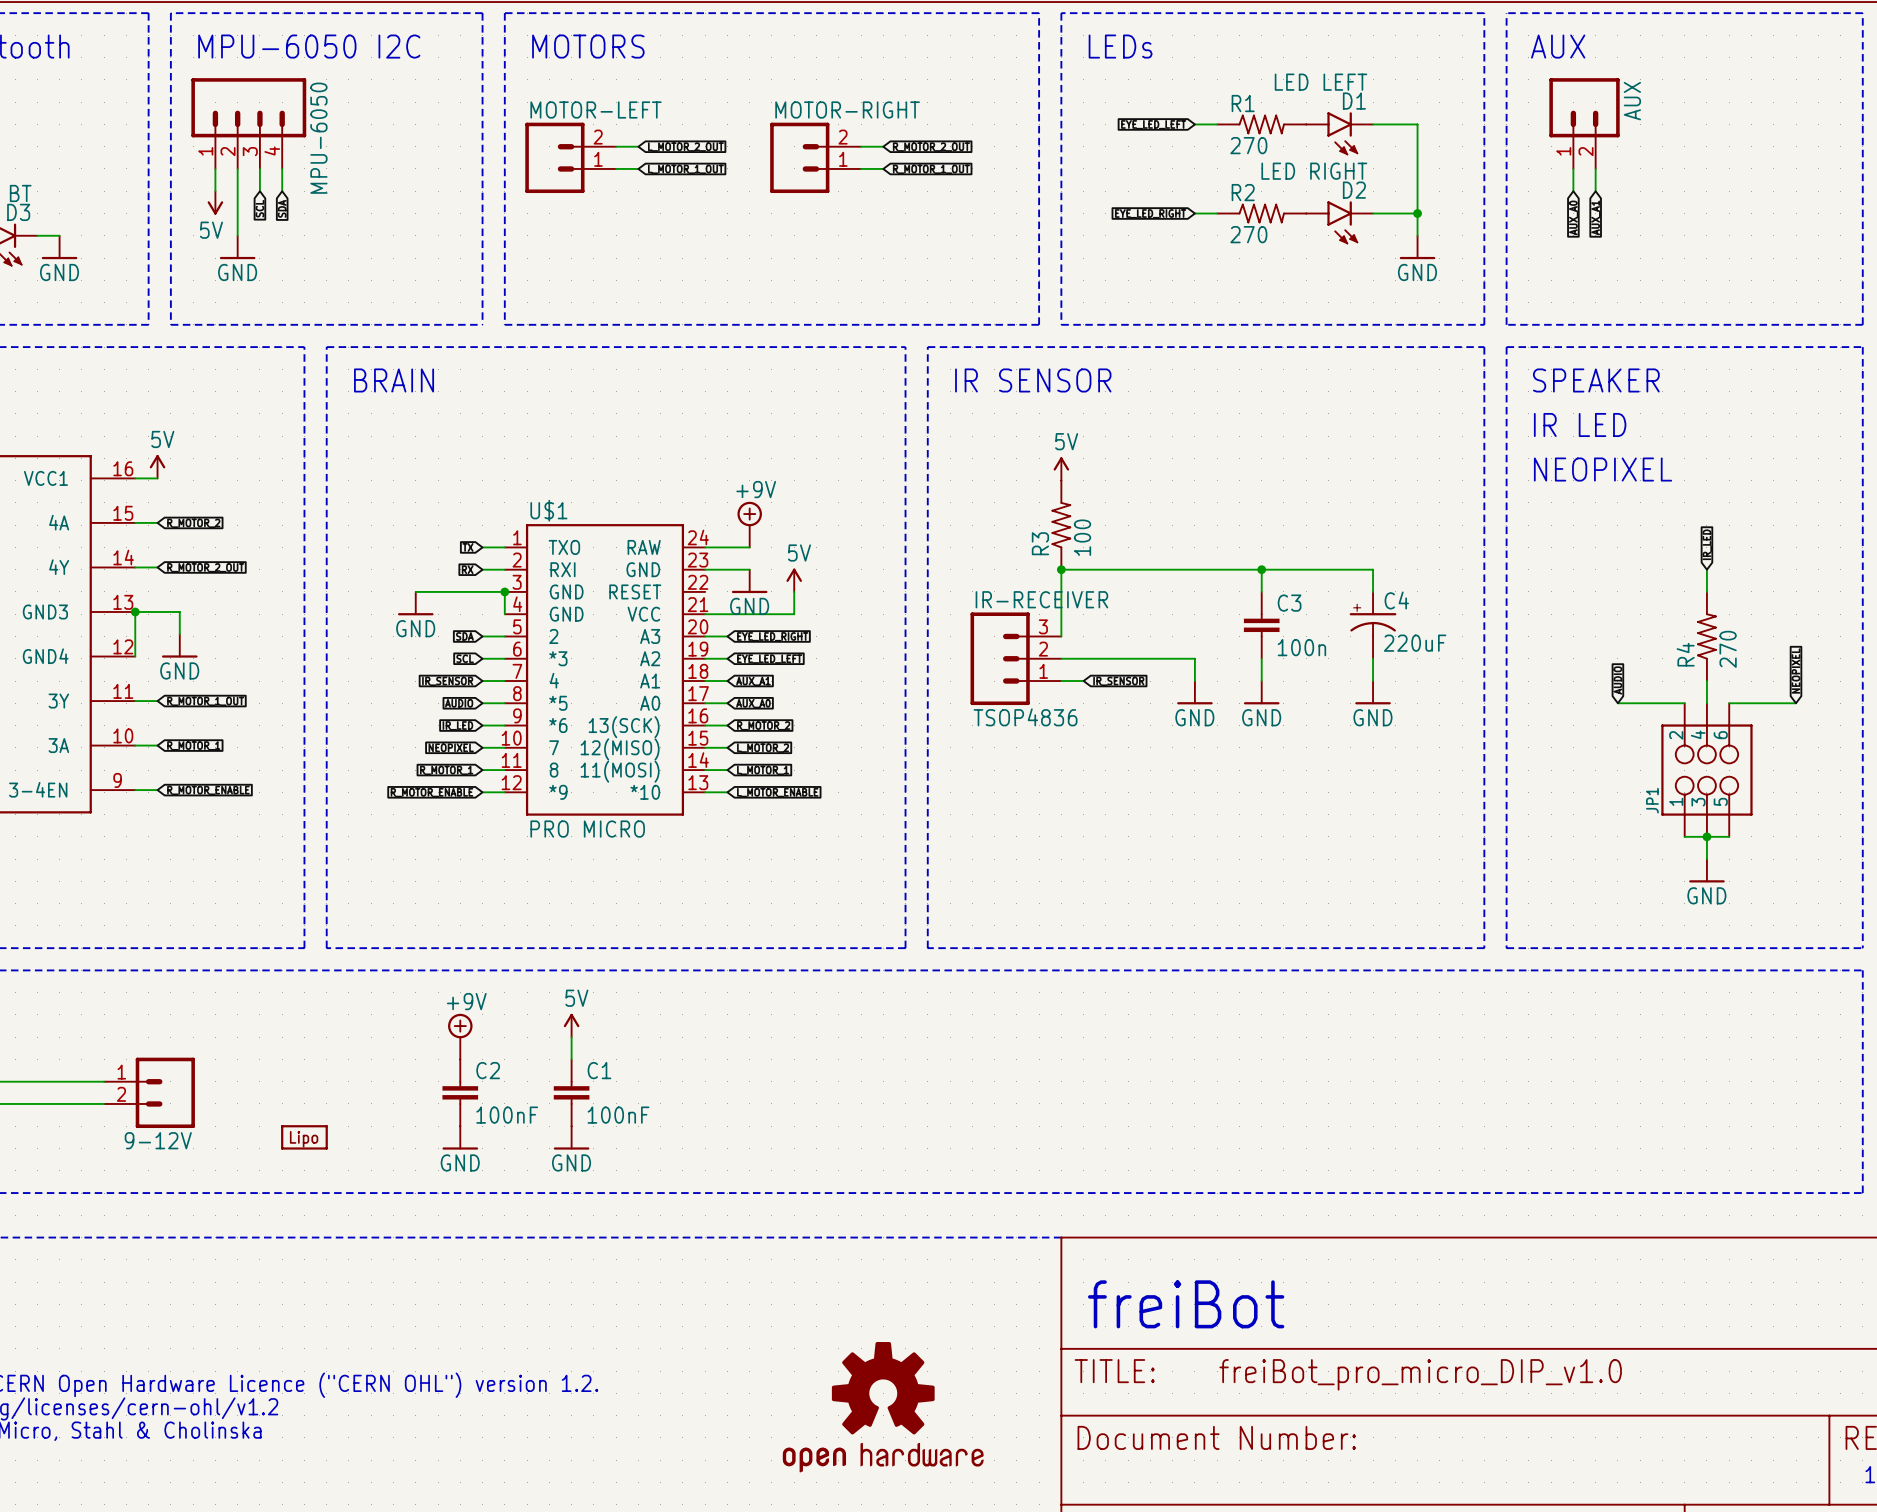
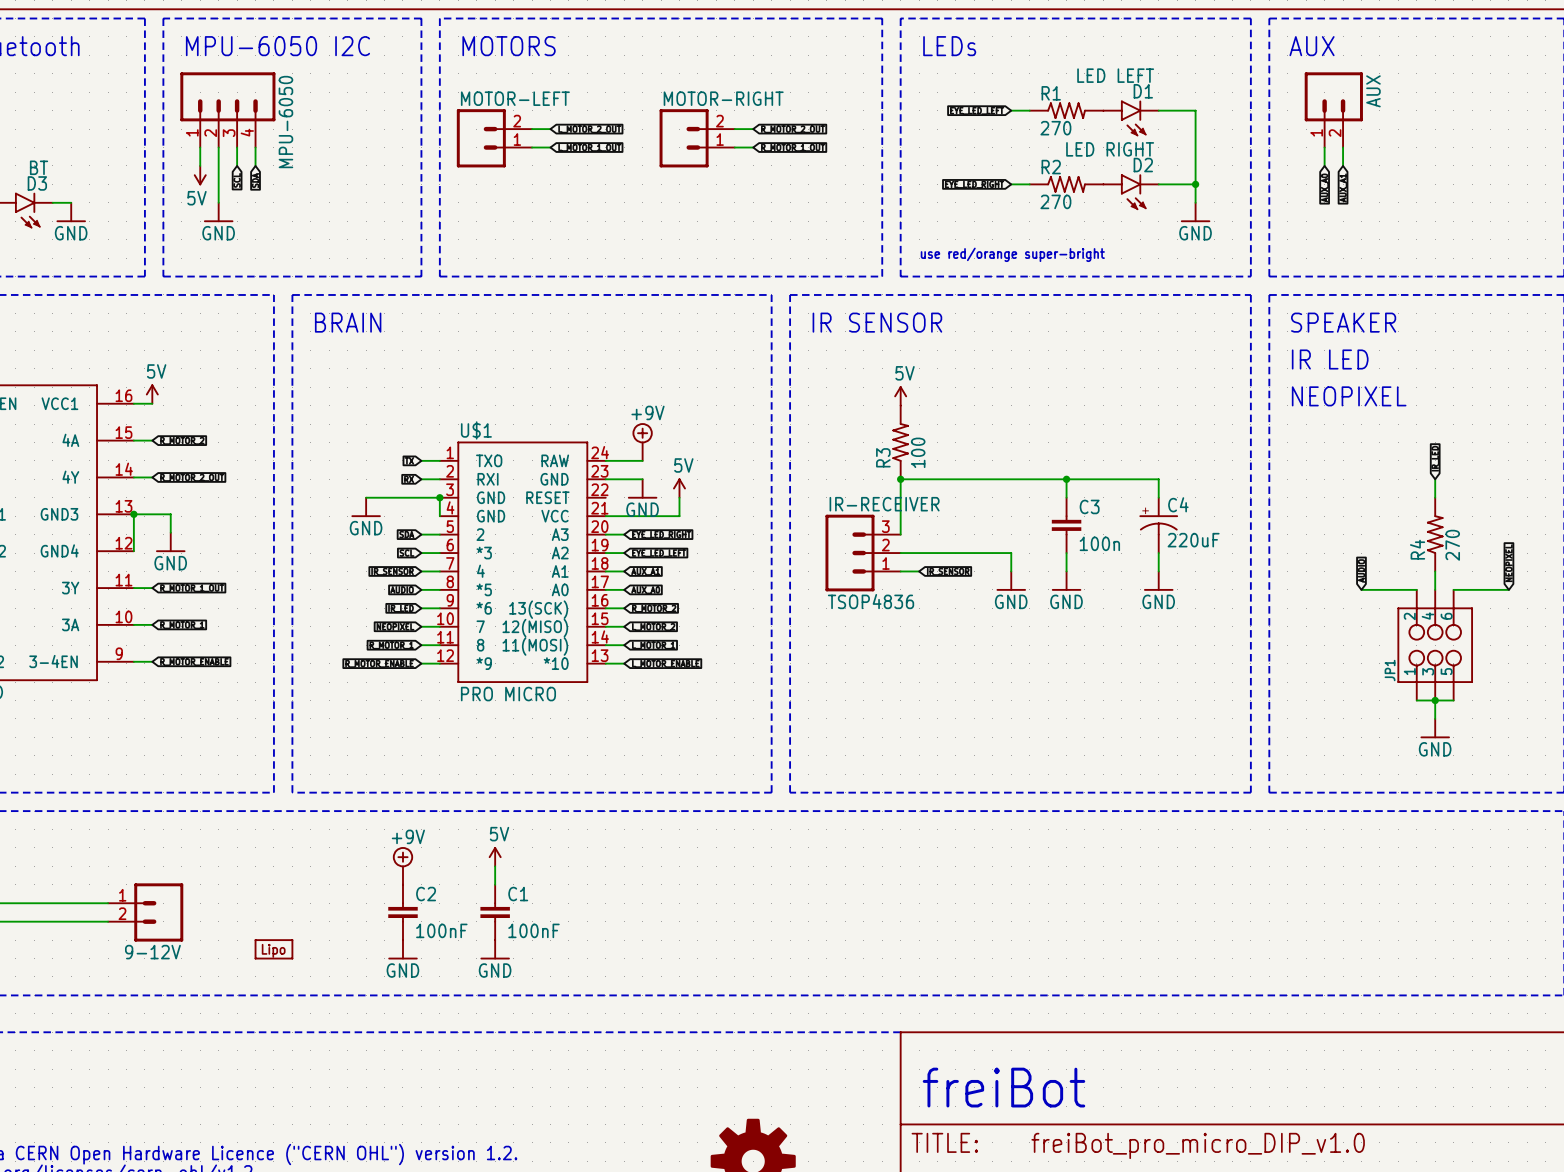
text: none -> use red/orange super-bright (1012, 254)

